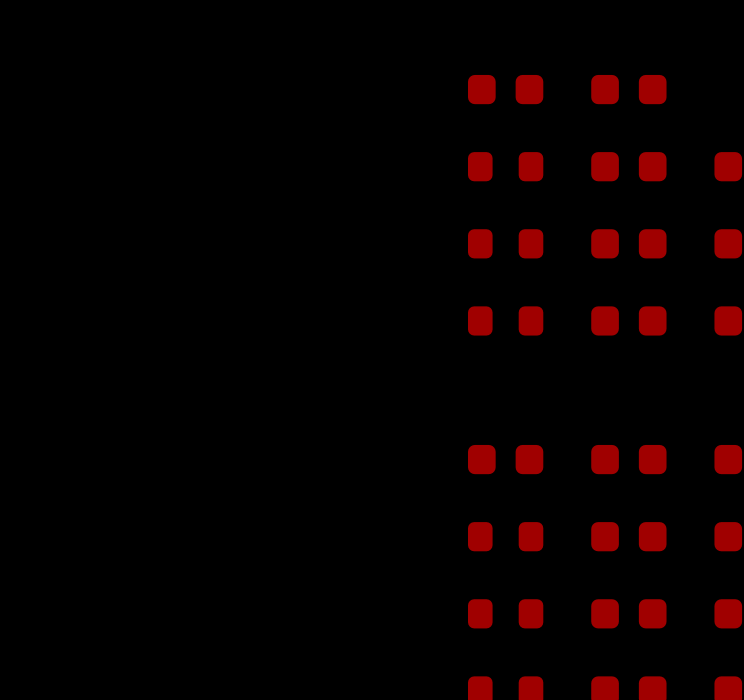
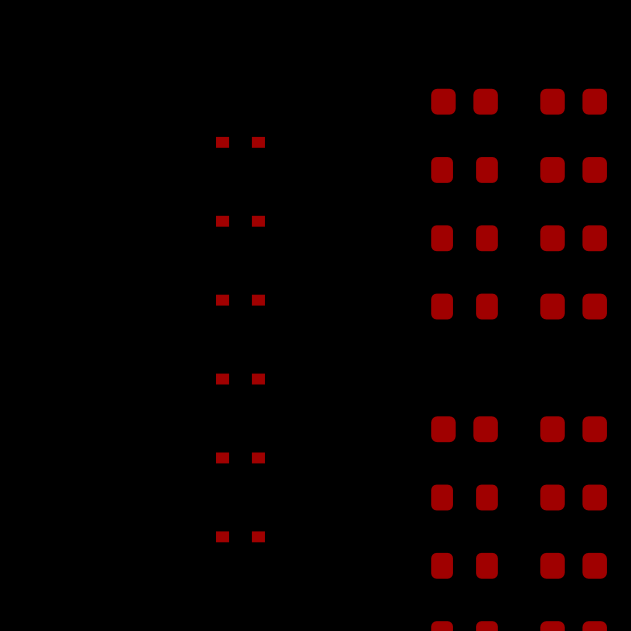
part: none -> (240, 142)
part: none -> (240, 221)
part: none -> (240, 300)
part: none -> (240, 379)
part: none -> (240, 457)
part: none -> (240, 536)

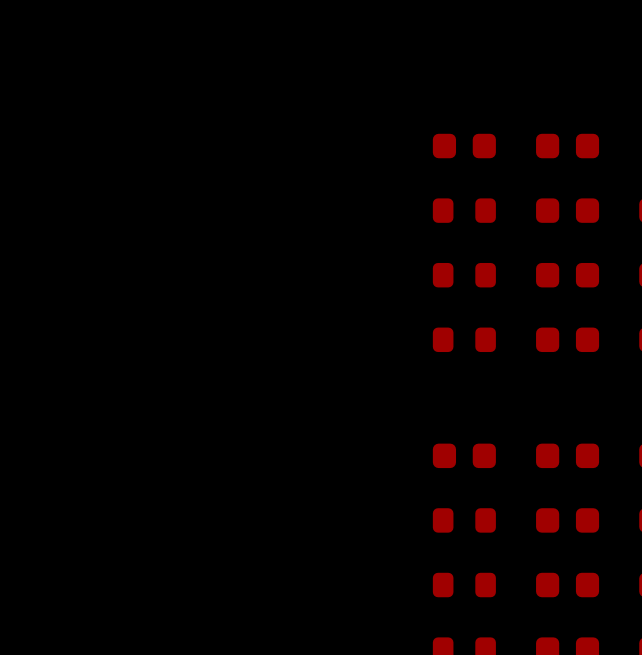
part: (240, 142) -> none
part: (240, 221) -> none
part: (240, 300) -> none
part: (240, 379) -> none
part: (240, 457) -> none
part: (240, 536) -> none

